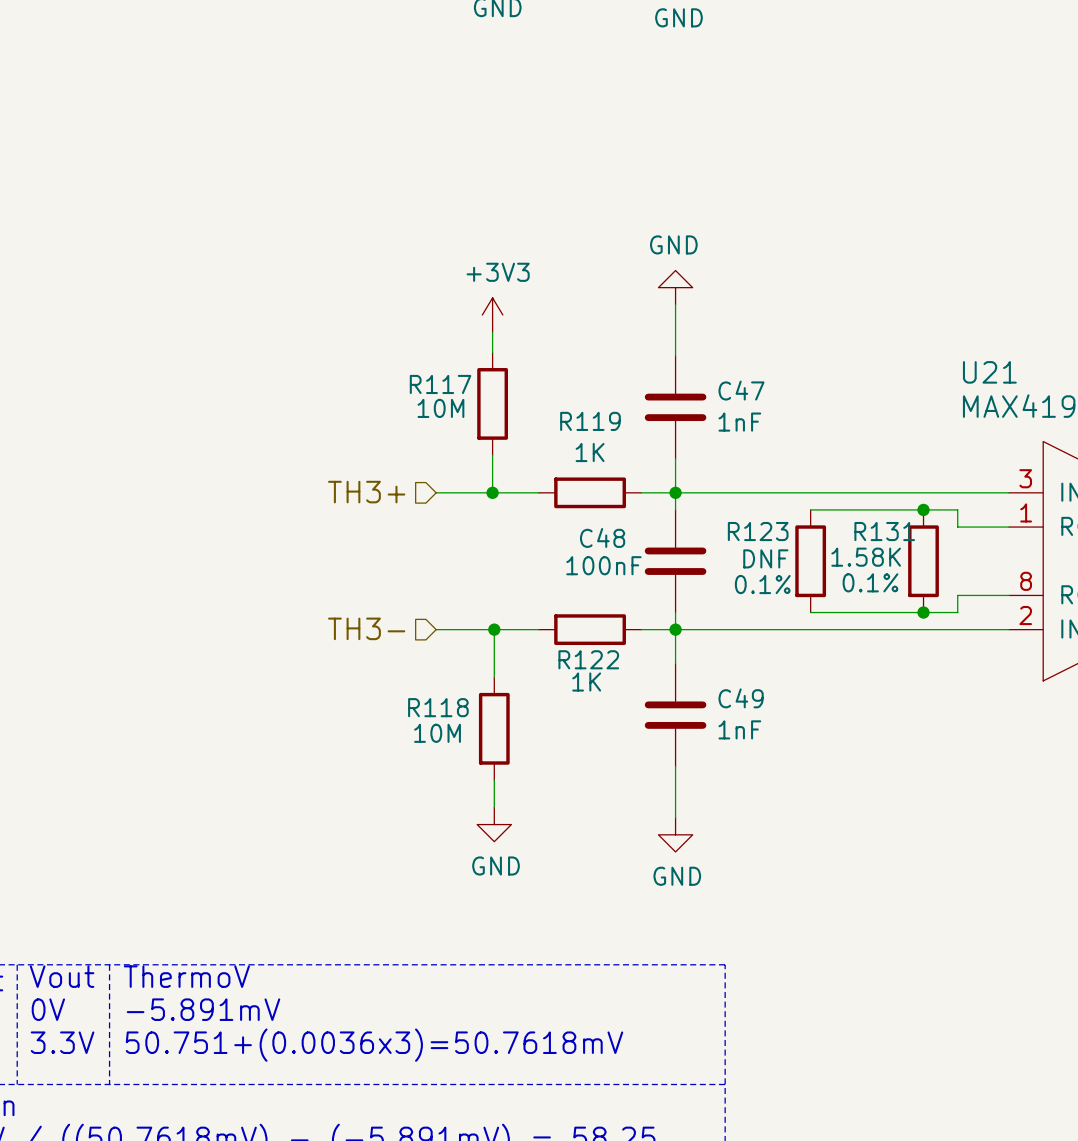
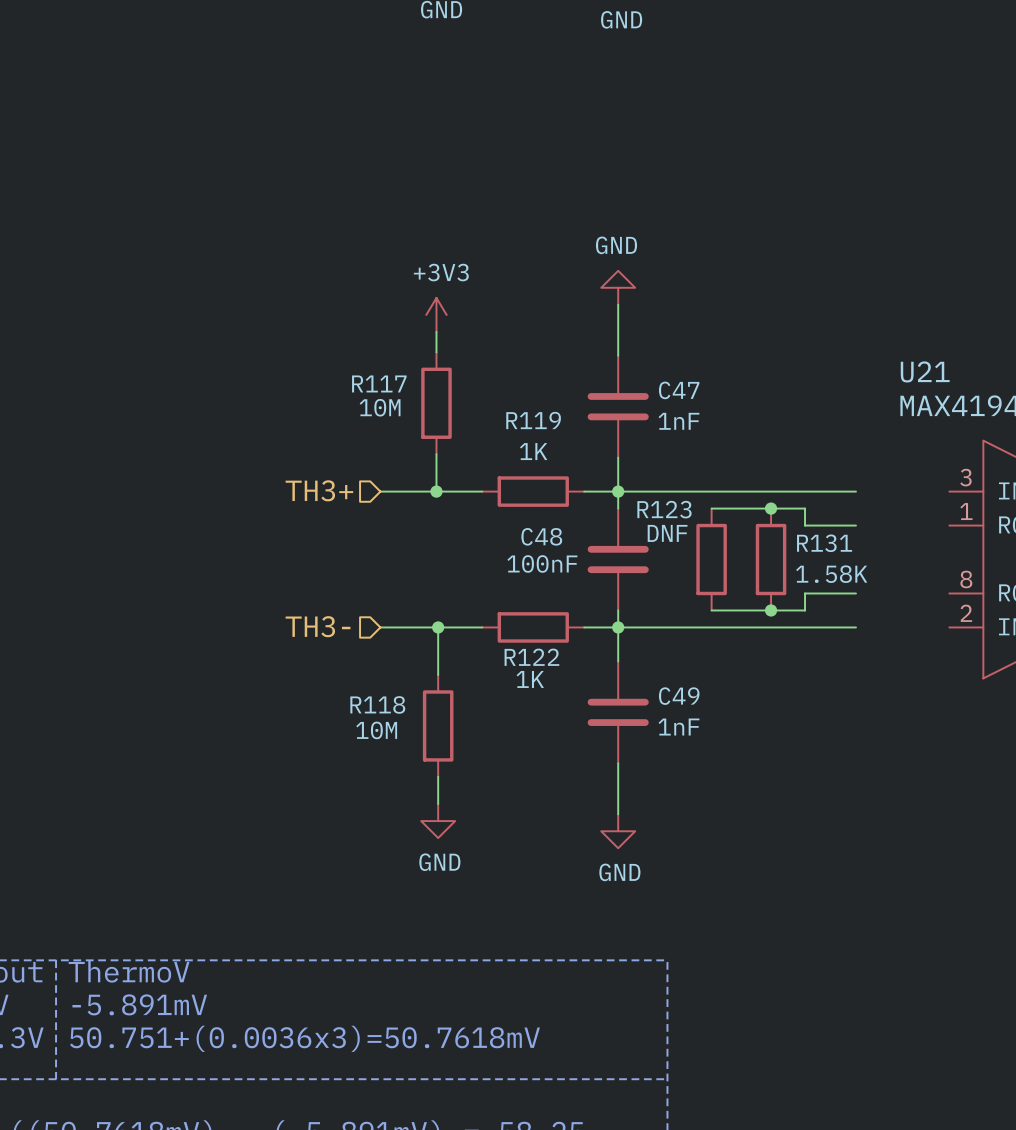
wire: (914, 492) (1009, 492) -> none
wire: none -> (711, 508) (752, 508)
junction: none -> (771, 508)
wire: (863, 509) (957, 509) (957, 527) (1009, 527) -> (805, 508) (805, 525) (855, 525)
junction: (923, 509) -> none
R123 name position: R123 (758, 531) -> R123 (664, 509)
R131 name position: R131 (884, 531) -> R131 (824, 543)
R131 value position: 1.58K (866, 557) -> 1.58K (831, 574)
R123 value position: DNF (765, 558) -> DNF (667, 533)
R123 position: (810, 561) -> (711, 559)
R131 position: (923, 561) -> (771, 559)
R131 text: 0.1% (870, 582) -> none
R123 text: 0.1% (762, 584) -> none
wire: (1009, 595) (957, 595) (957, 612) (863, 612) -> (855, 593) (805, 593) (805, 610)
wire: none -> (711, 610) (752, 610)
junction: none -> (771, 610)
junction: (923, 612) -> none
wire: (914, 629) (1009, 629) -> none

